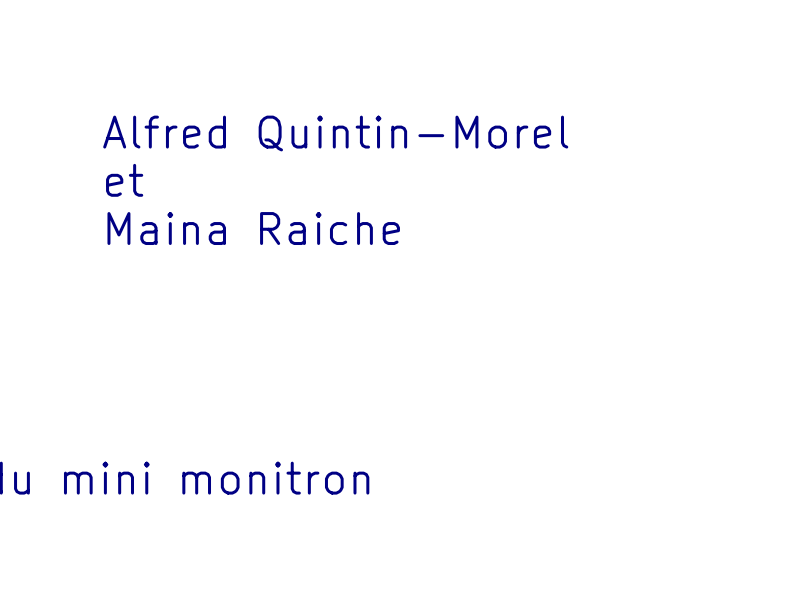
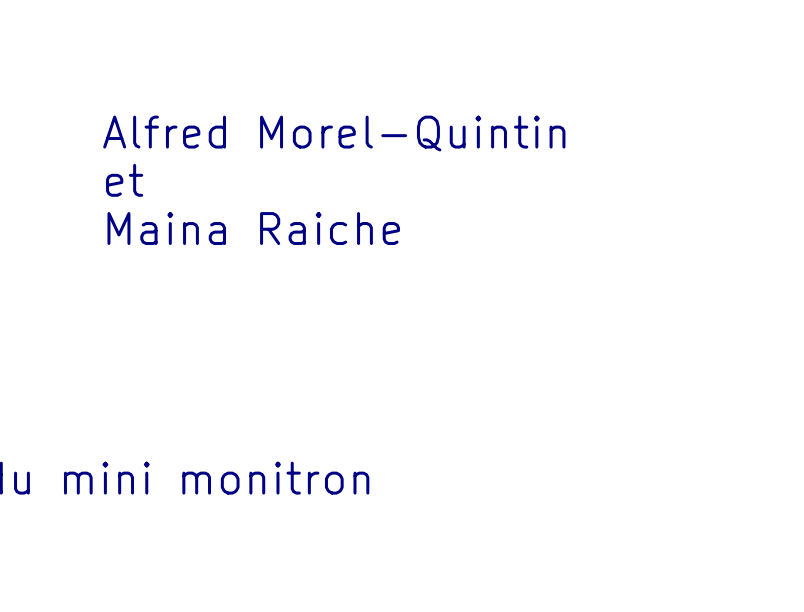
text: Alfred Quintin-Morel (335, 133) -> Alfred Morel-Quintin (334, 133)

